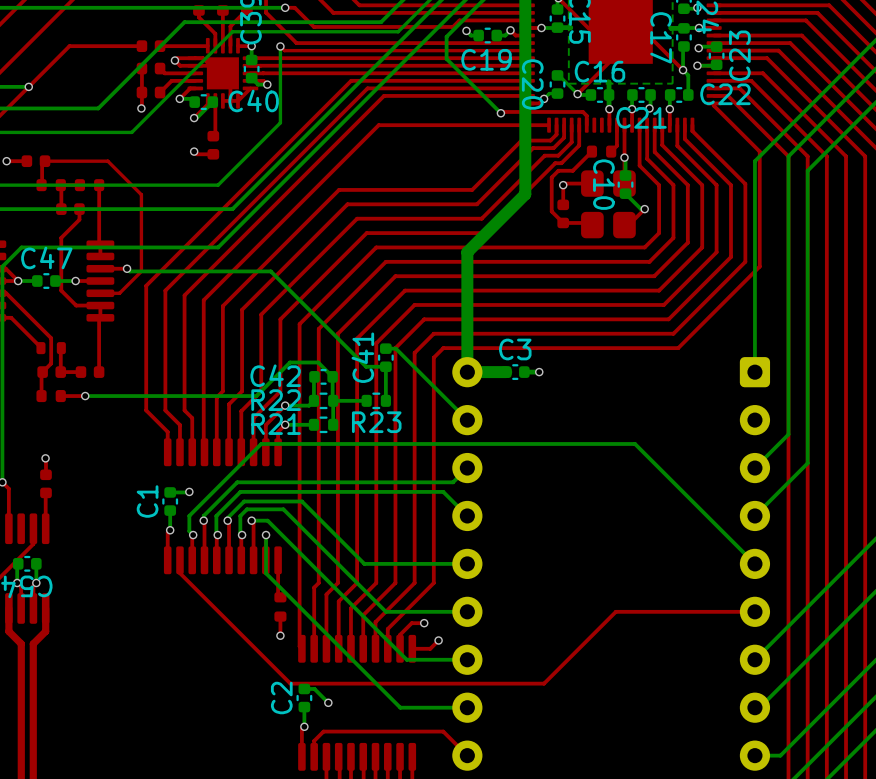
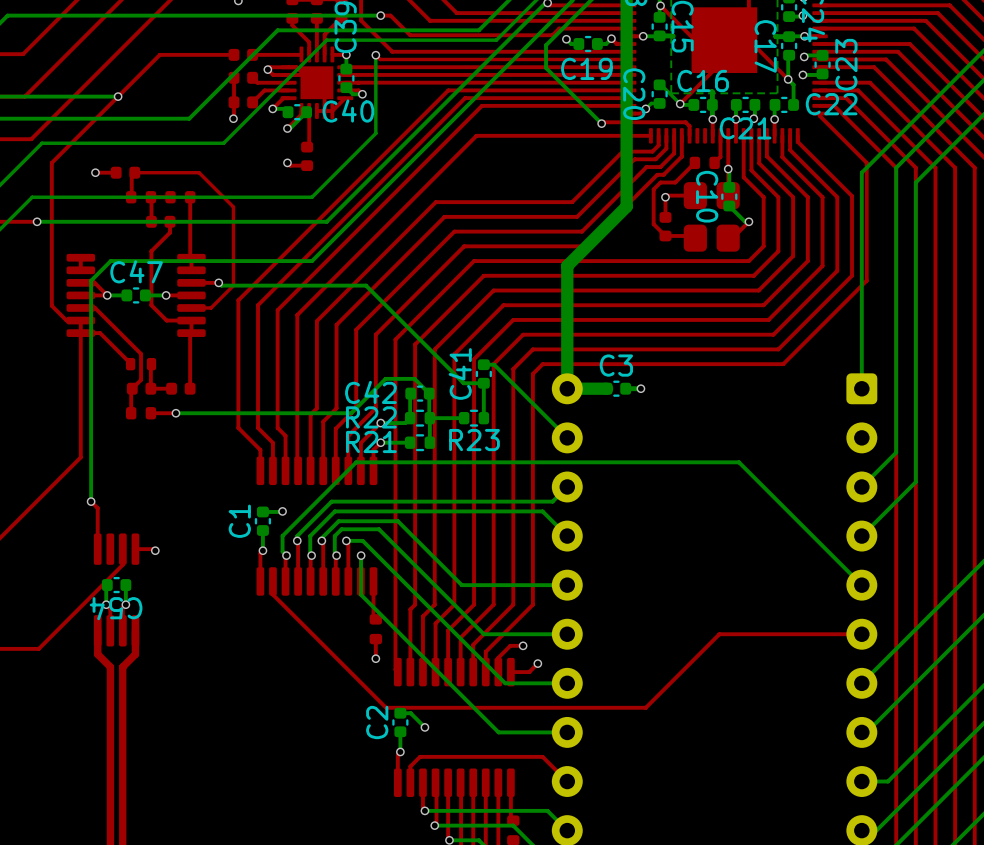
top track: (45, 458) (45, 474) -> none
via position: (45, 458) -> (155, 550)
part: (45, 483) -> none
top track: (45, 492) (45, 528) -> (155, 550) (135, 549)

